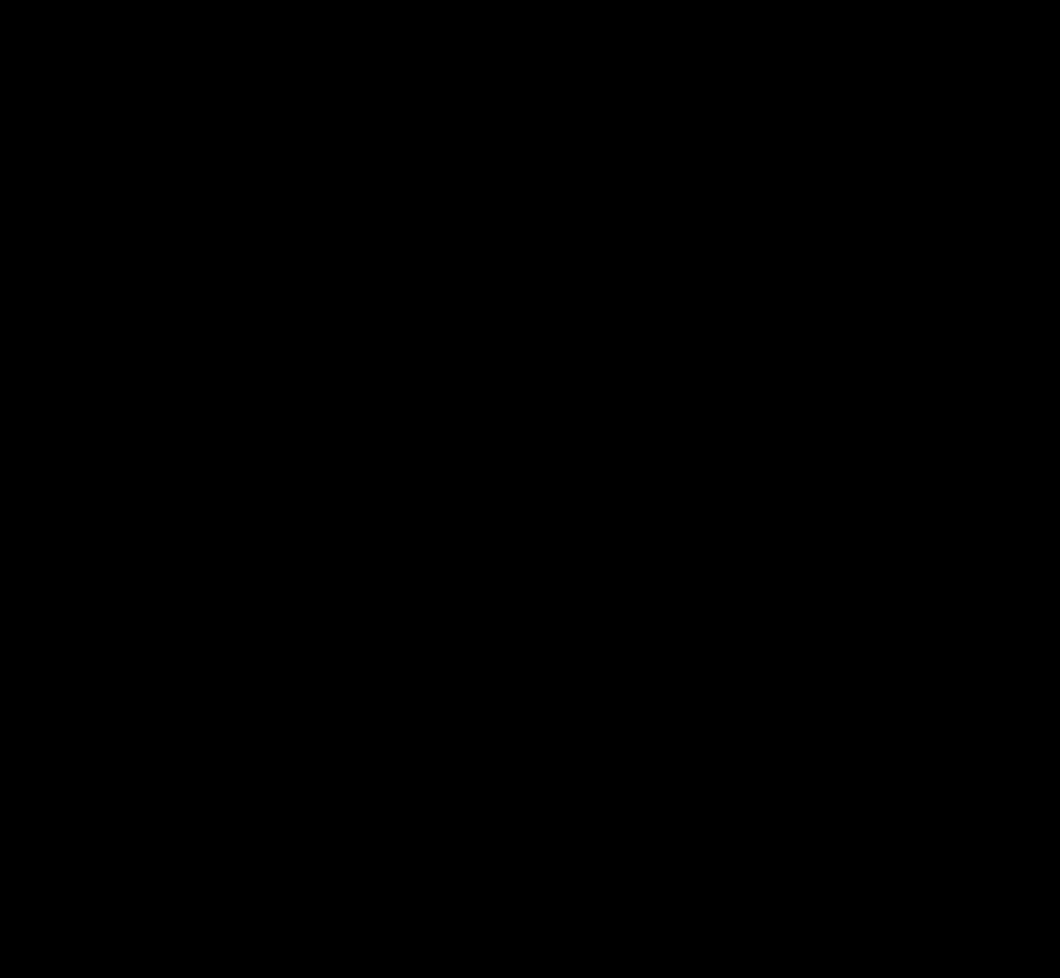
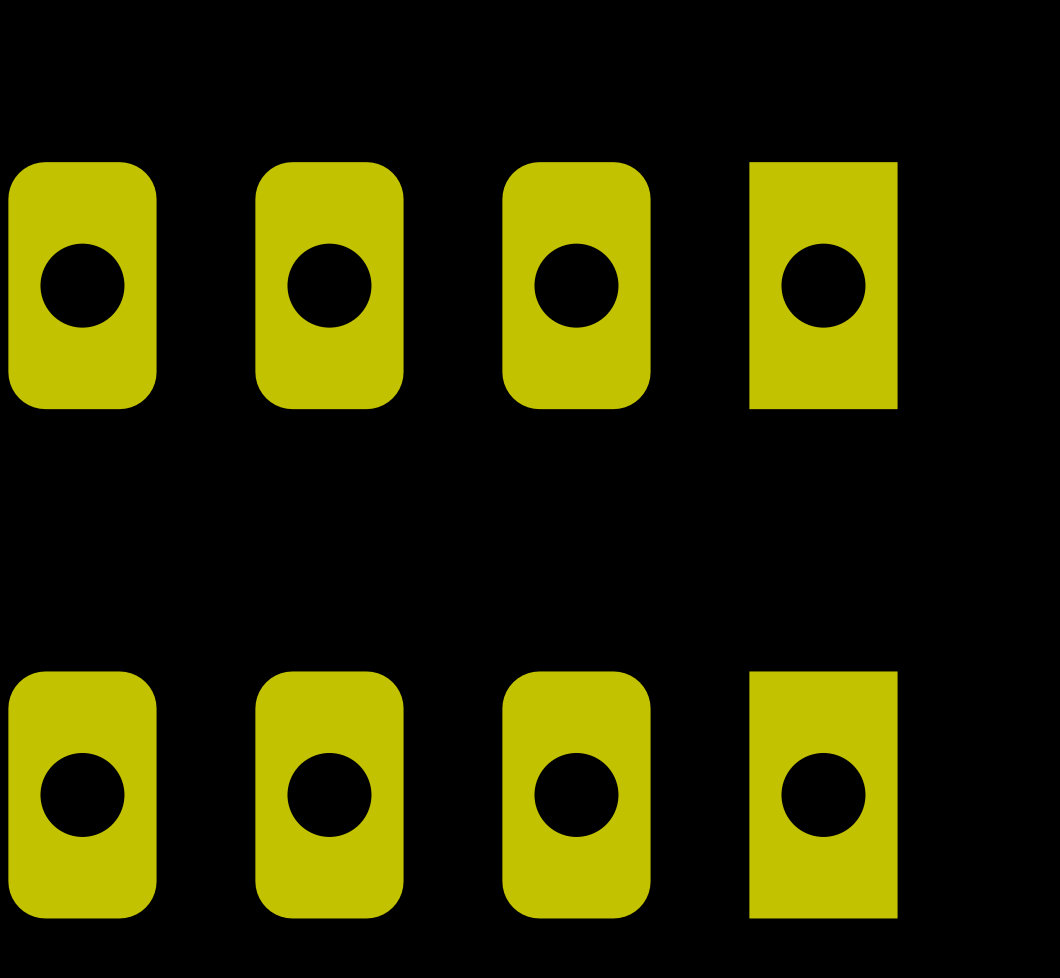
part: none -> (452, 285)
part: none -> (452, 794)

